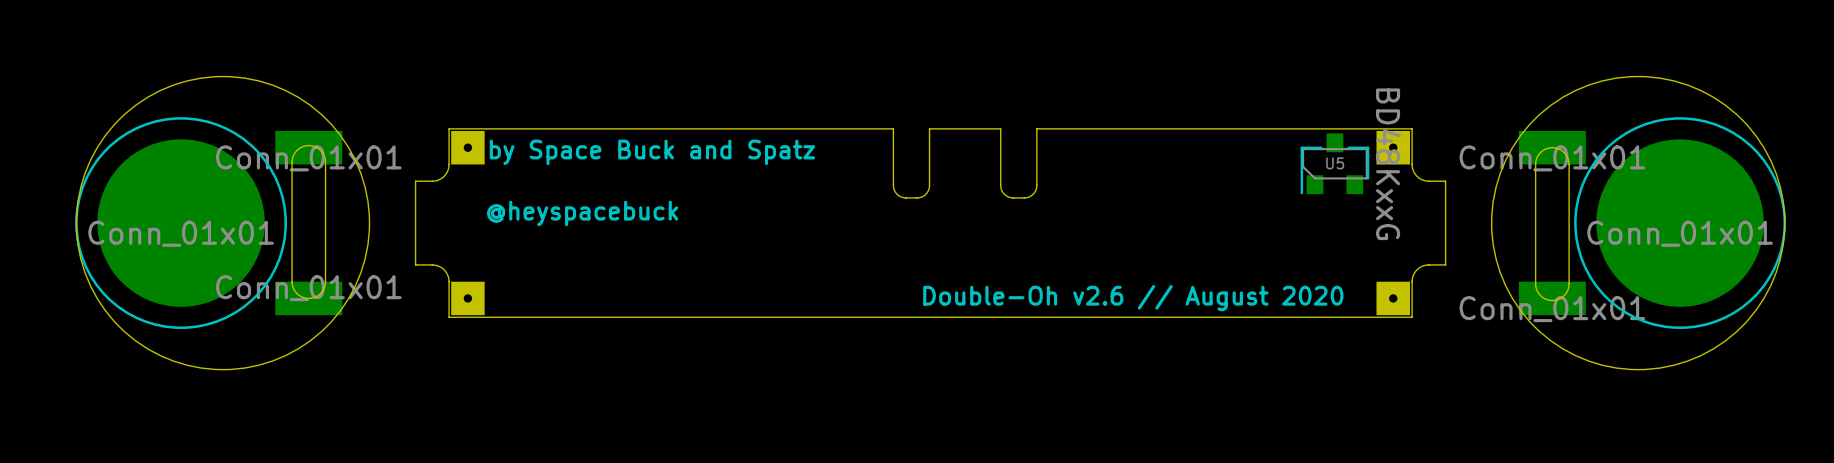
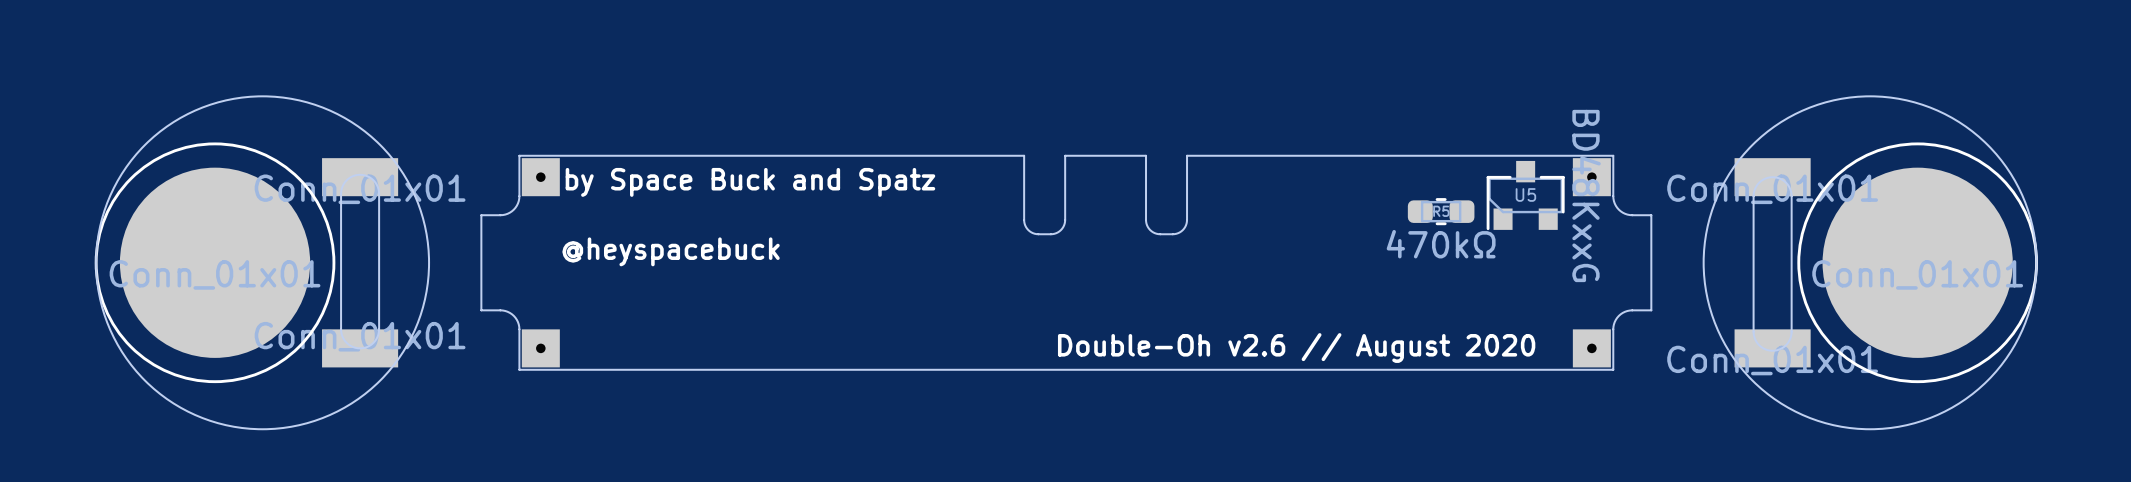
R5: none -> 470kΩ (1441, 211)

